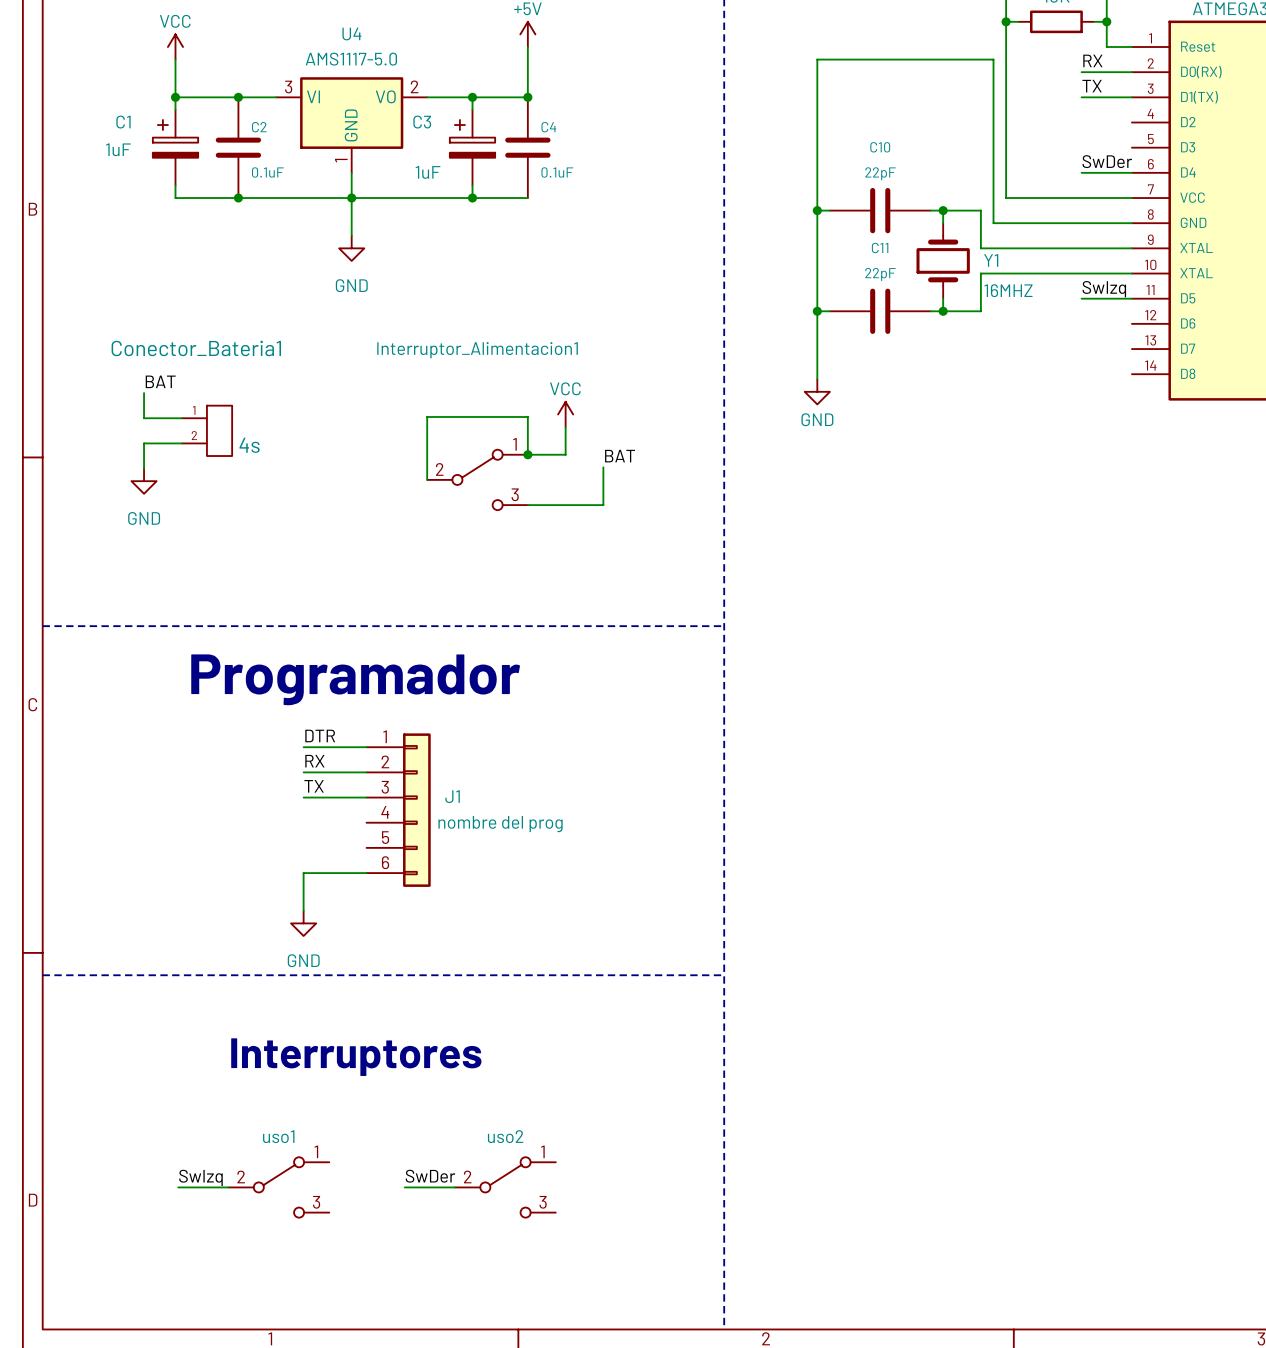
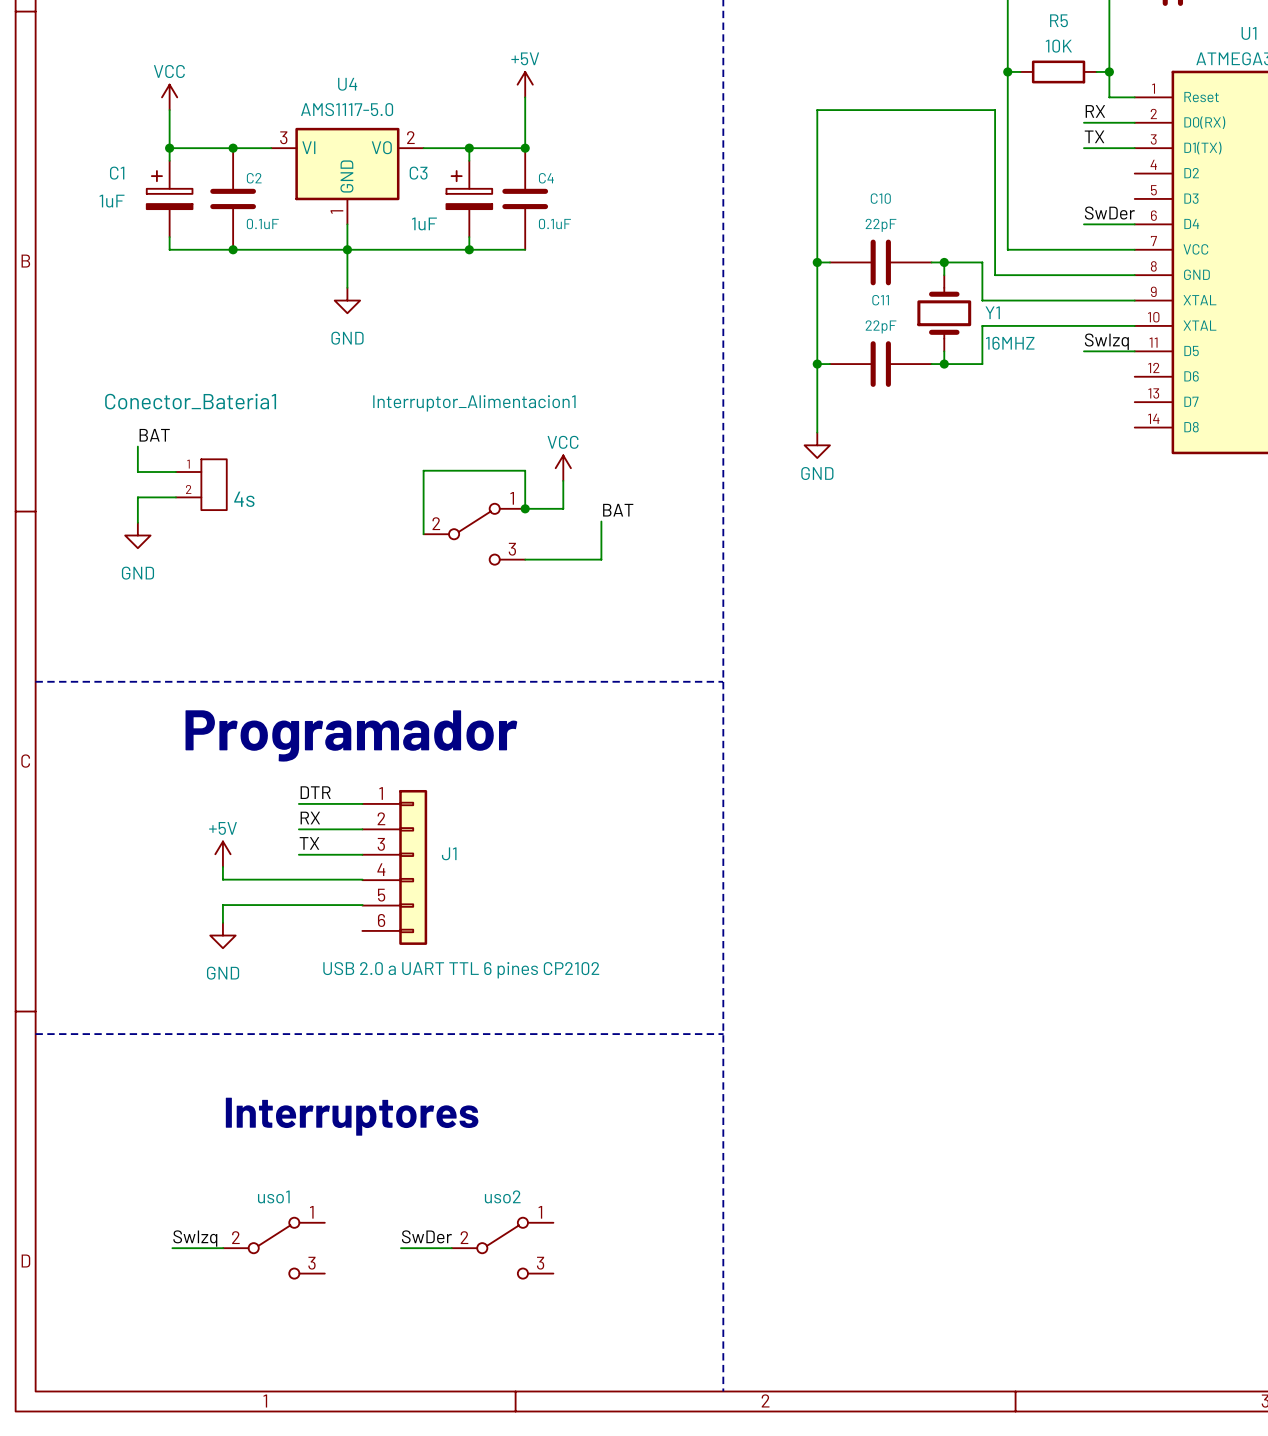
power symbol: none -> +5V (222, 854)
wire: none -> (222, 866) (222, 879) (362, 879)
J1 value: nombre del prog (500, 824) -> USB 2.0 a UART TTL 6 pines CP2102 (461, 970)
wire: none -> (362, 905) (222, 905) (222, 922)
wire: (366, 873) (303, 873) (303, 910) -> none
power symbol position: GND (303, 923) -> GND (222, 935)

